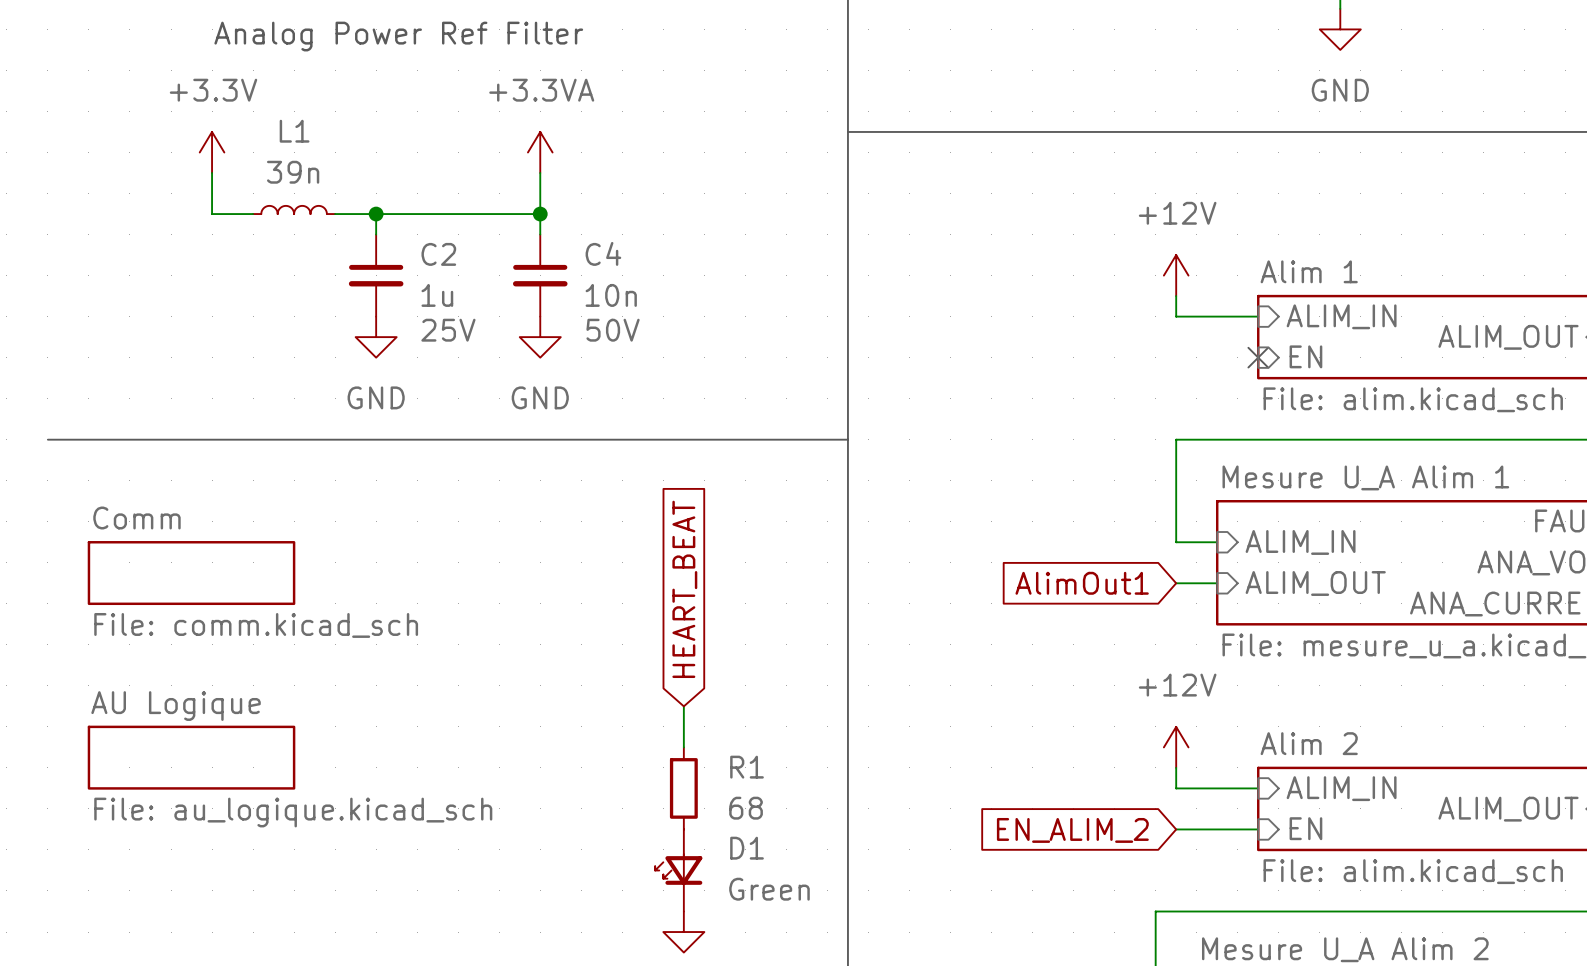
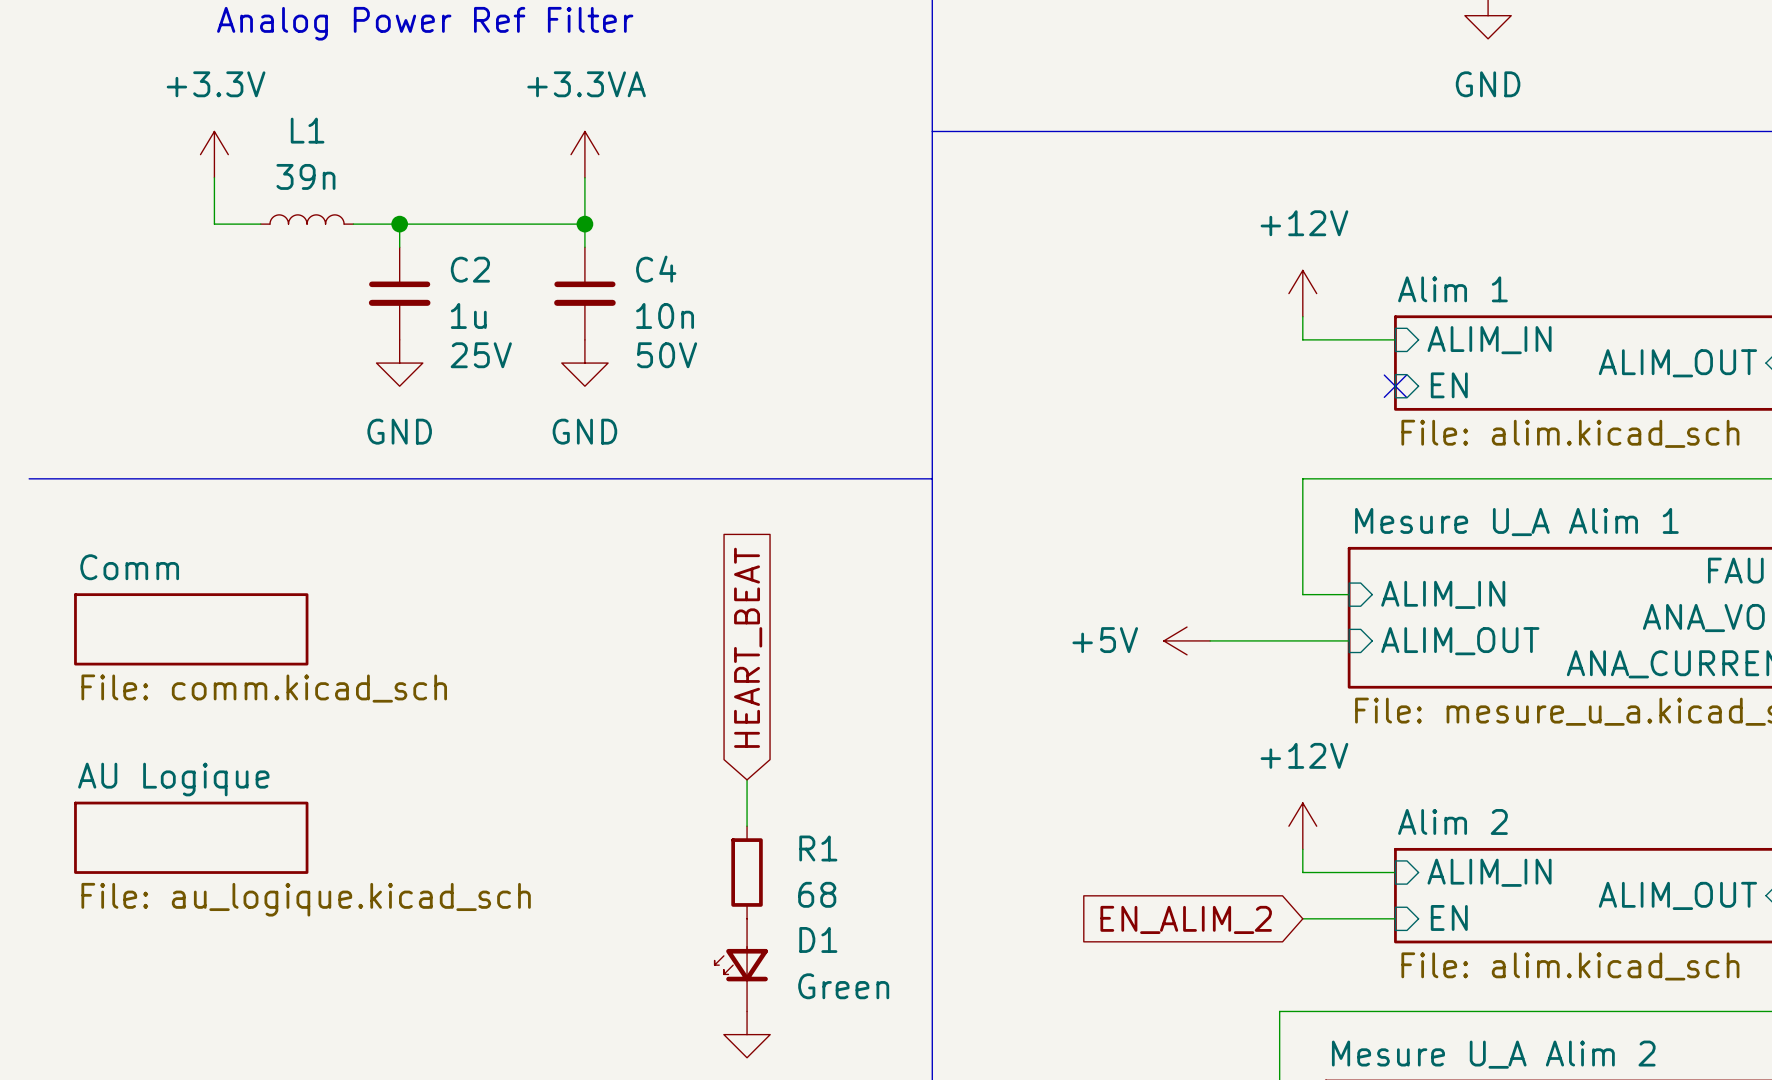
power symbol: none -> +5V (1187, 640)
global label: AlimOut1 (1082, 583) -> none
wire: none -> (1210, 640) (1302, 640)

